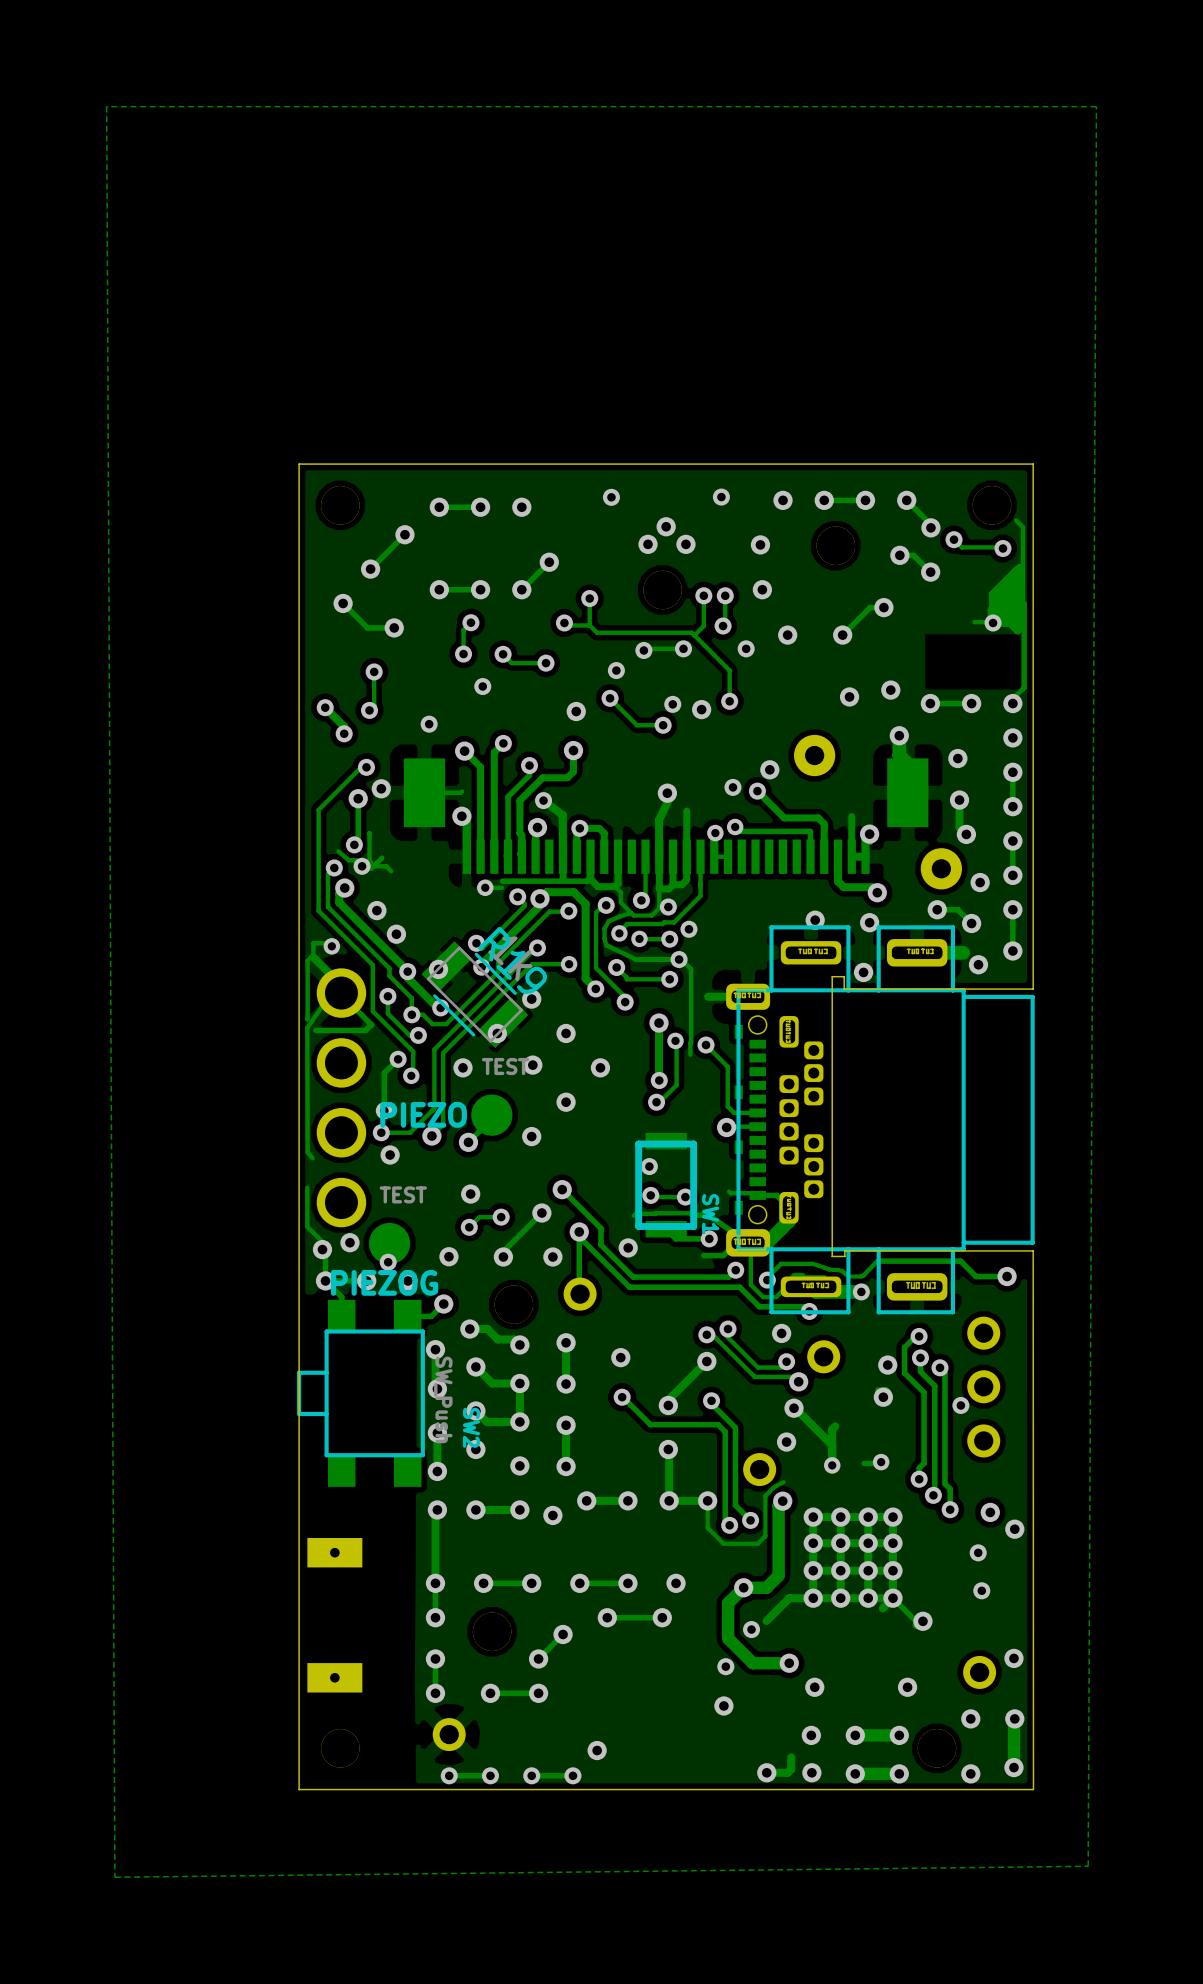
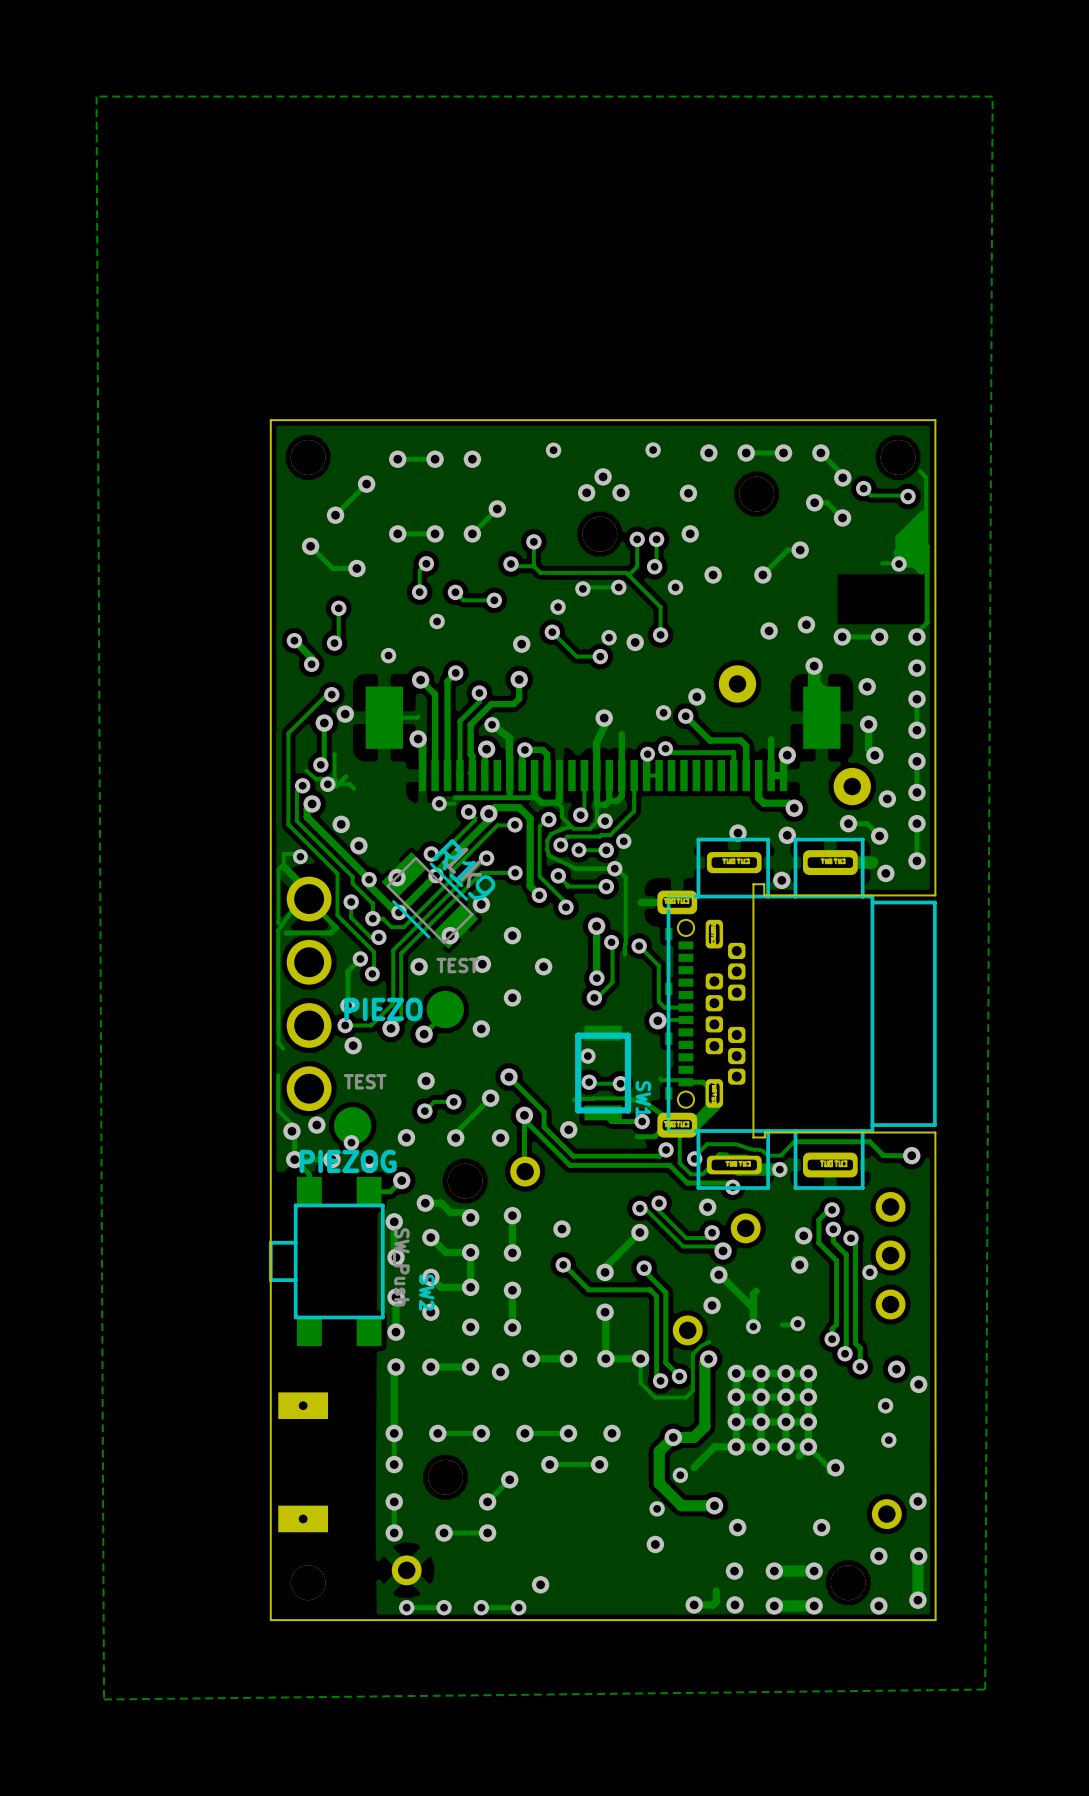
track: none -> (435, 875) (398, 912)

